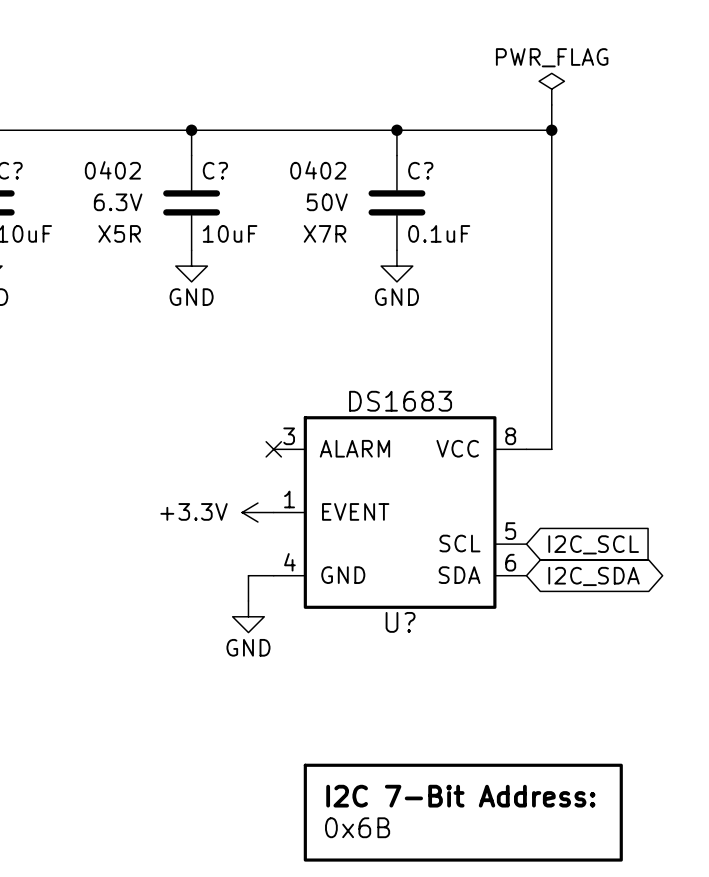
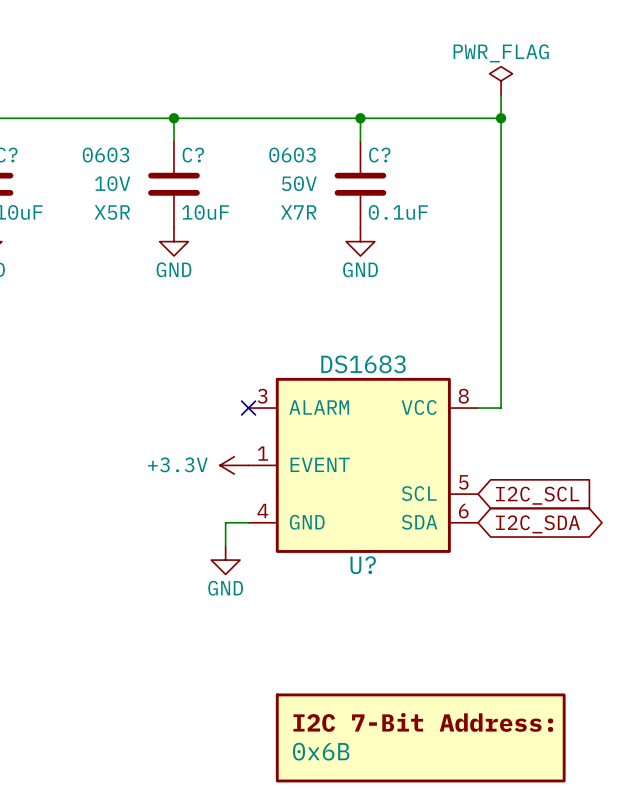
C? text: 0402 (112, 170) -> 0603 (106, 155)
C? text: 0402 (318, 170) -> 0603 (292, 155)
C? text: 6.3V (118, 202) -> 10V (112, 183)

